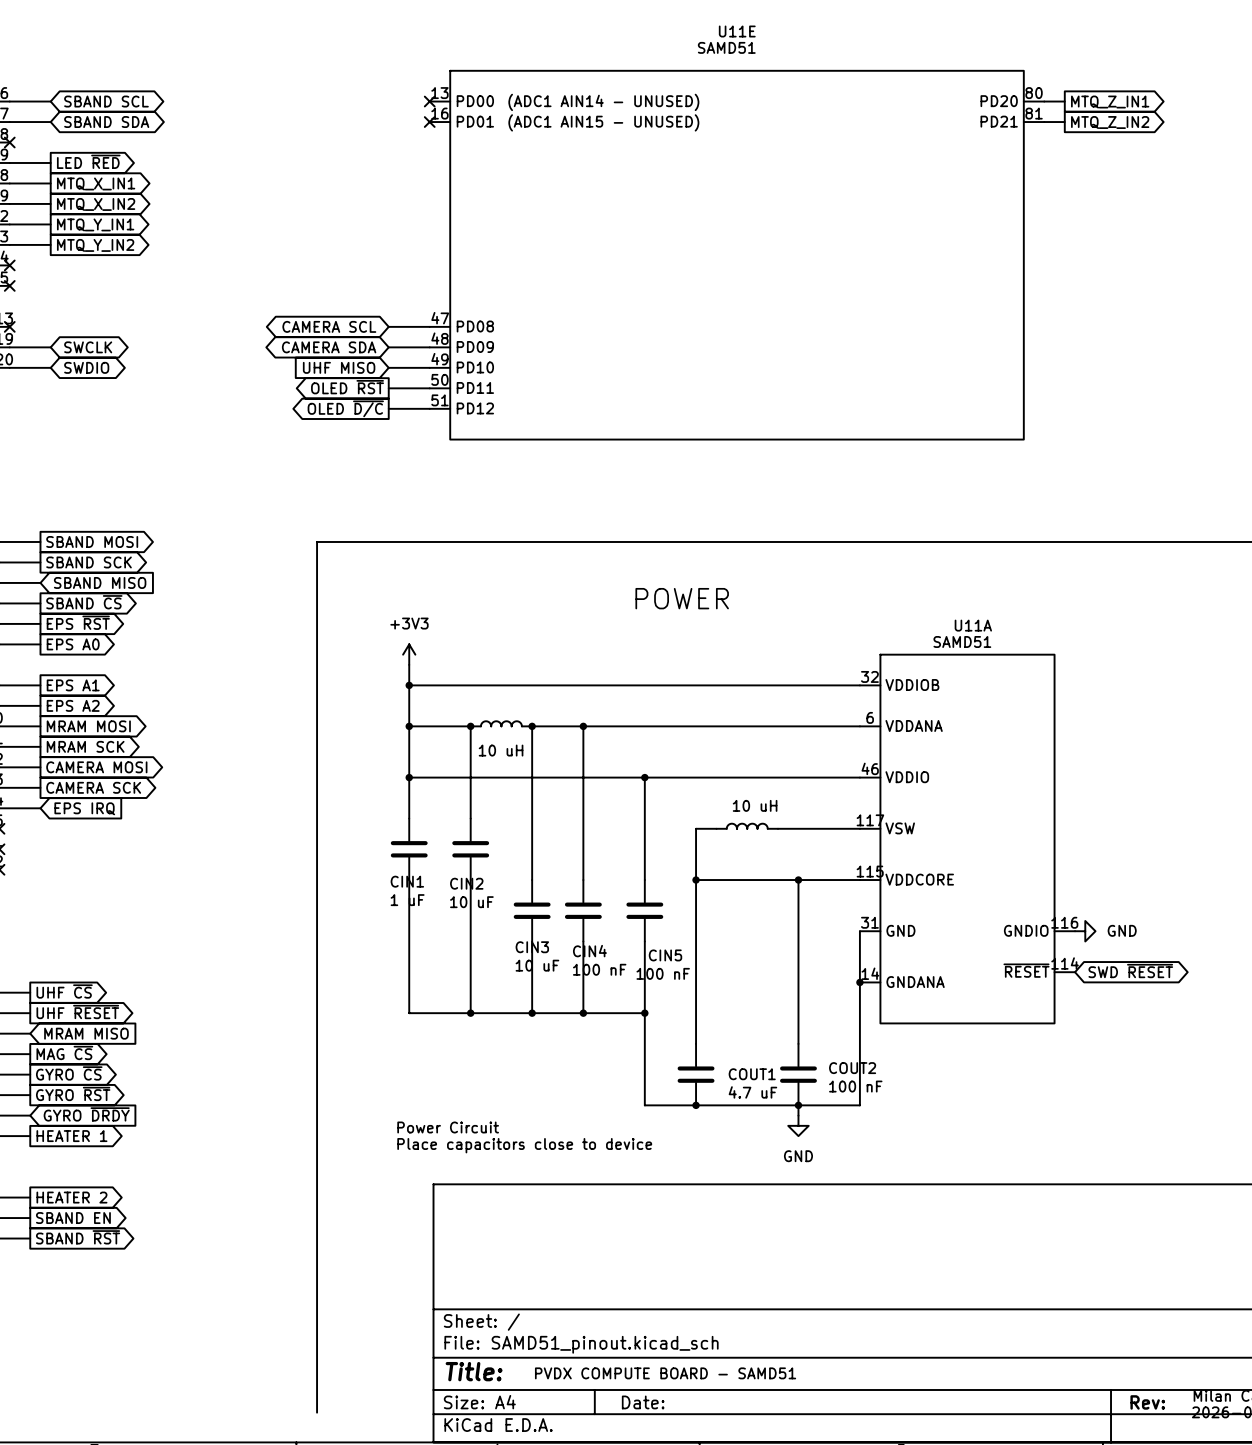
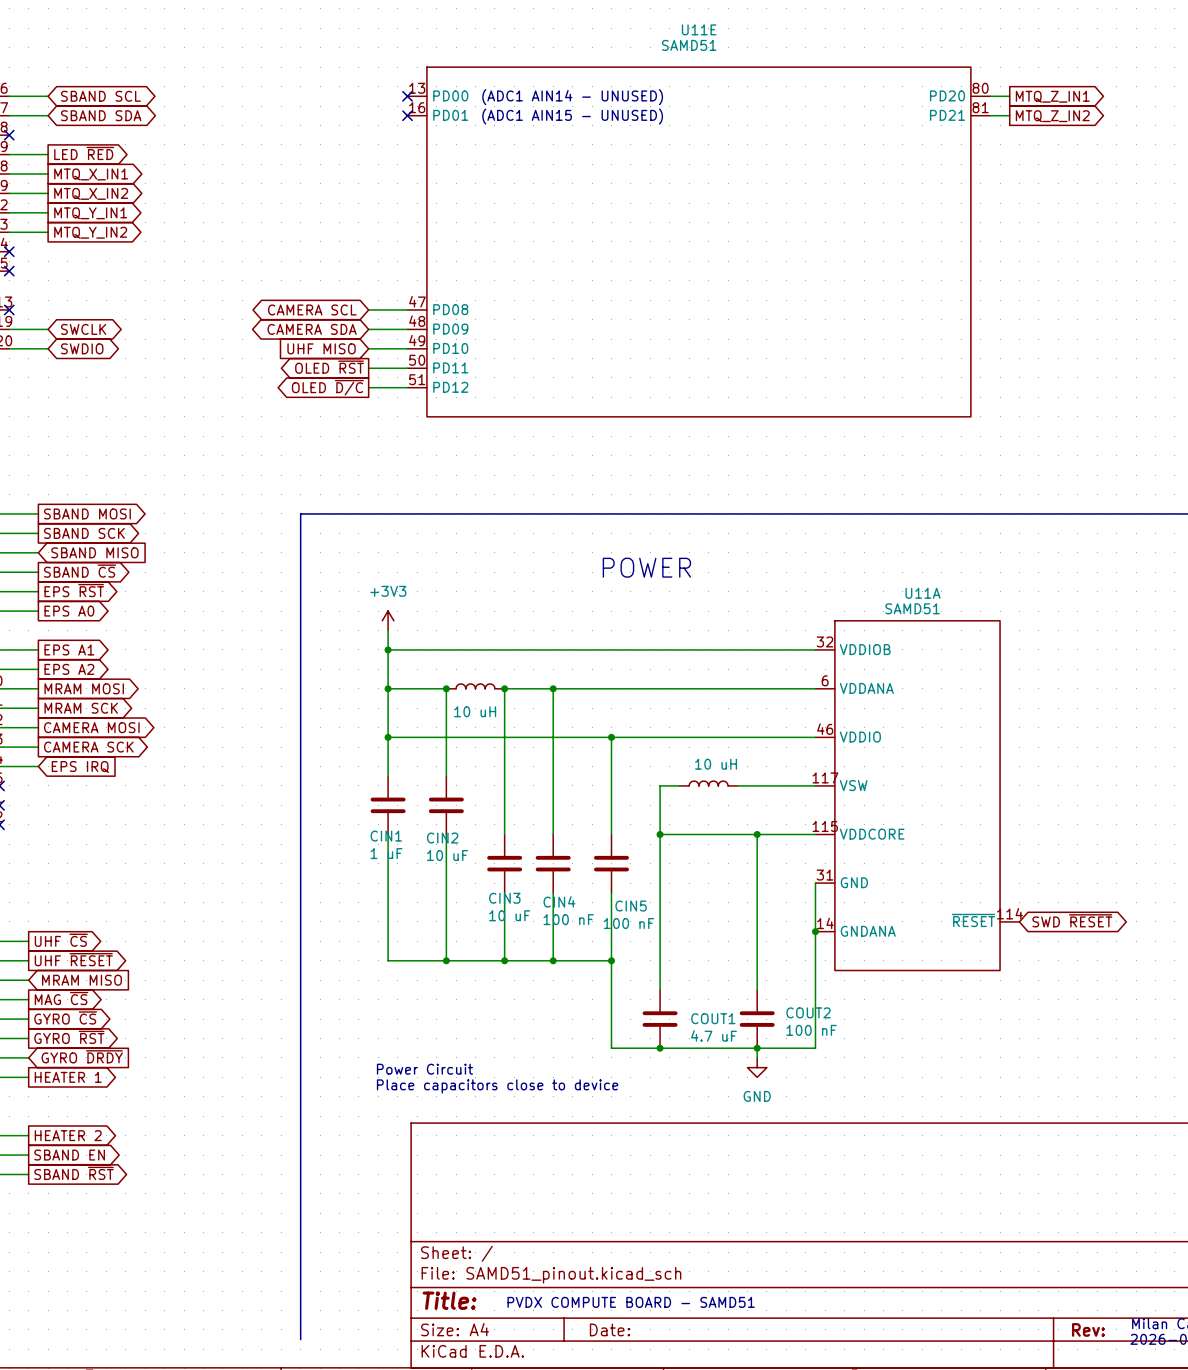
U11A symbol: [859, 654, 1076, 1024] -> [815, 620, 1020, 971]
power symbol: GND (1085, 931) -> none

